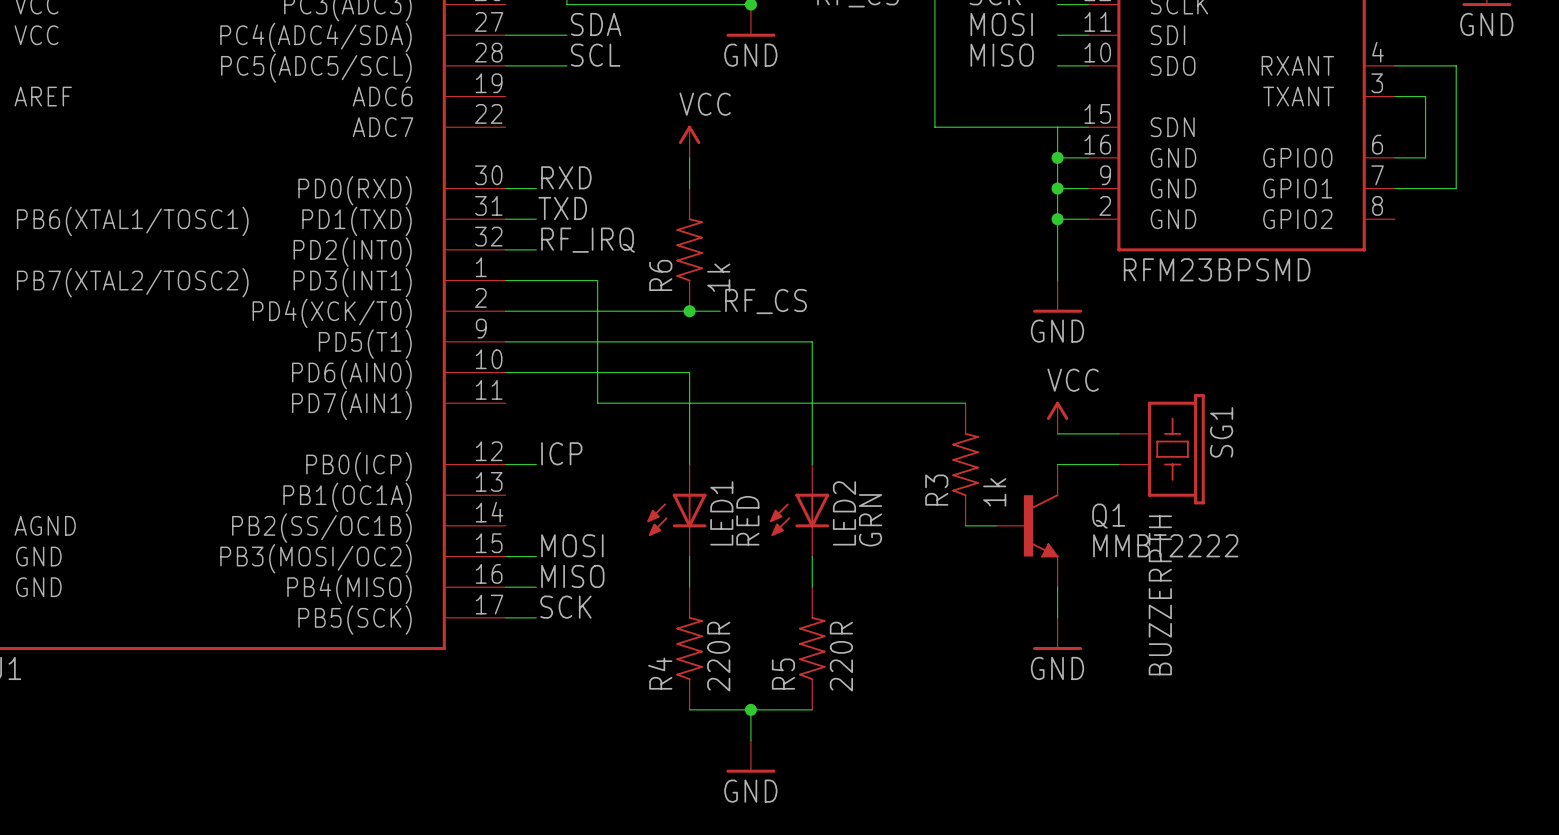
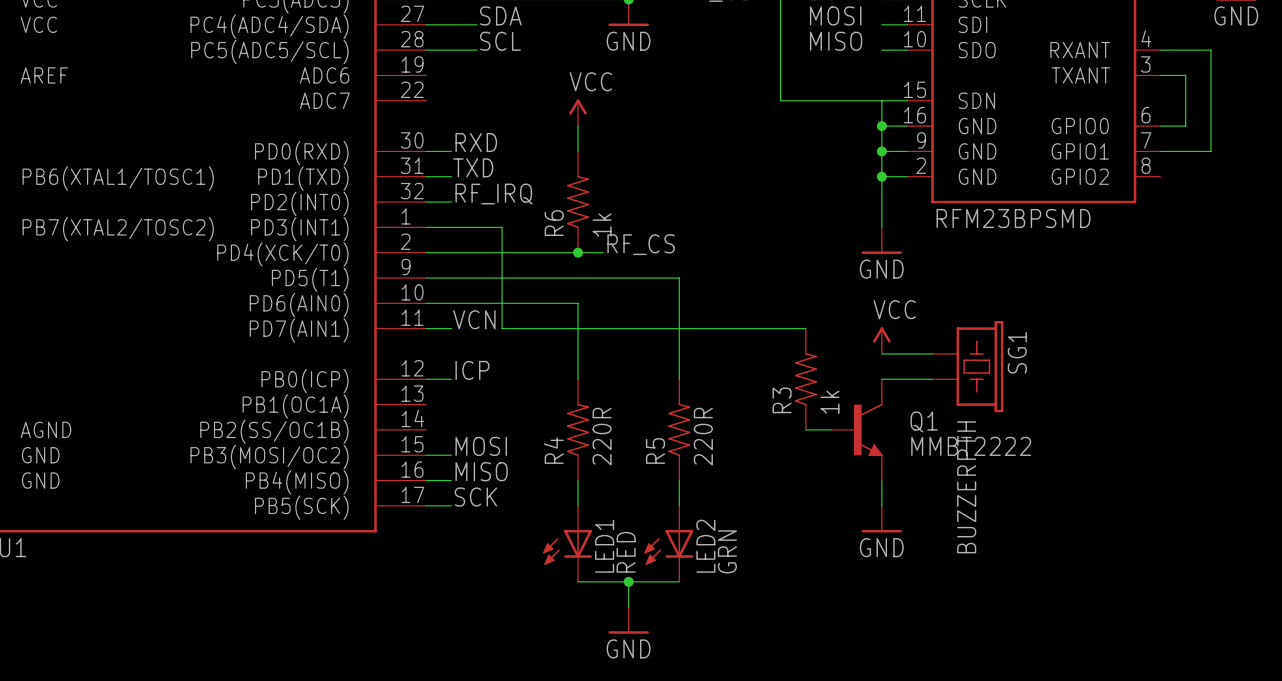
label: none -> VCN (474, 319)
wire: none -> (426, 328) (451, 328)
LED1 position: (676, 510) -> (567, 543)
LED2 position: (799, 510) -> (668, 543)
R4 position: (689, 648) -> (578, 429)
R5 position: (812, 648) -> (679, 429)

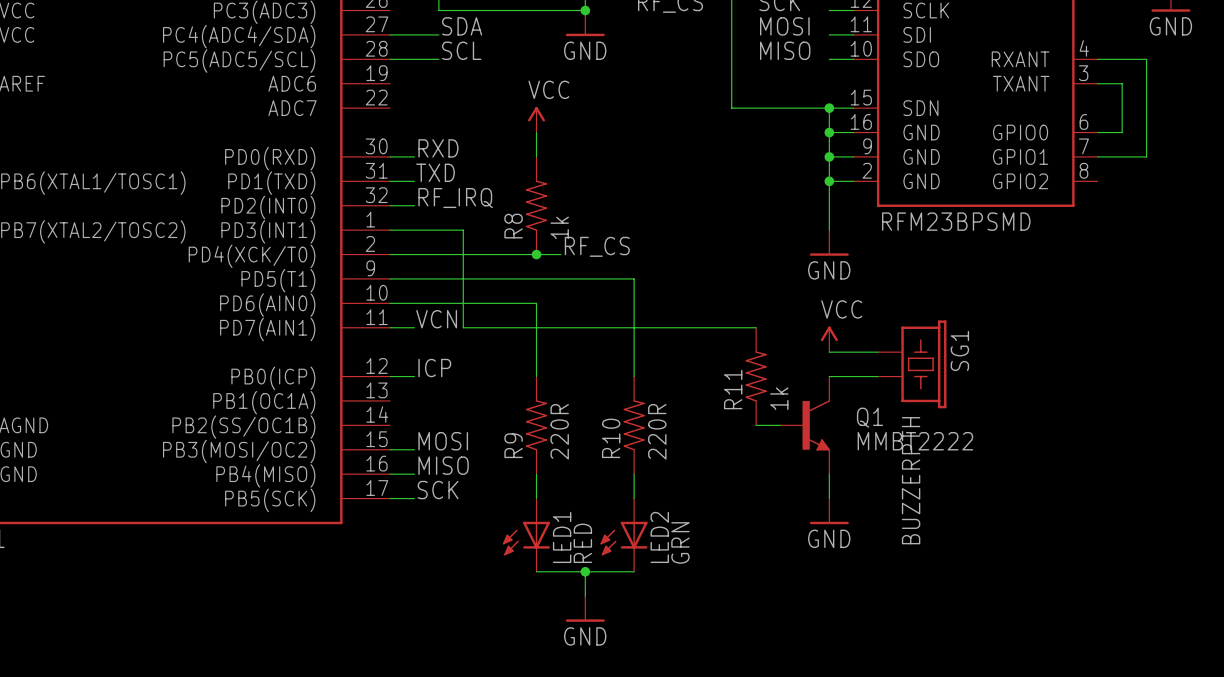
junction: none -> (829, 108)
R6 name: R6 (554, 223) -> R8 (513, 226)
R3 name: R3 (782, 400) -> R11 (733, 389)
R4 name: R4 (553, 450) -> R9 (513, 445)
R5 name: R5 (655, 451) -> R10 (611, 438)

